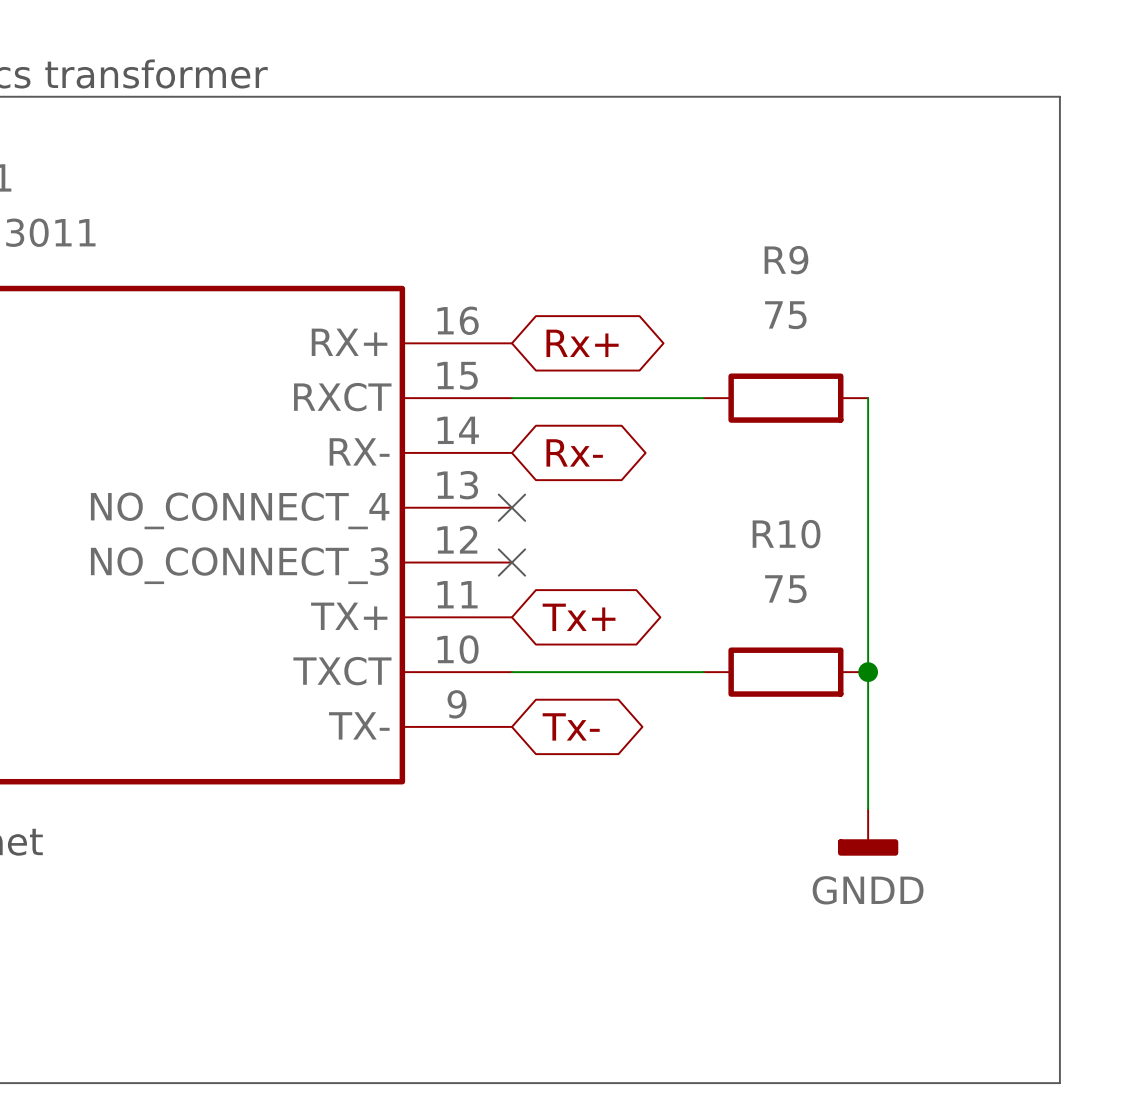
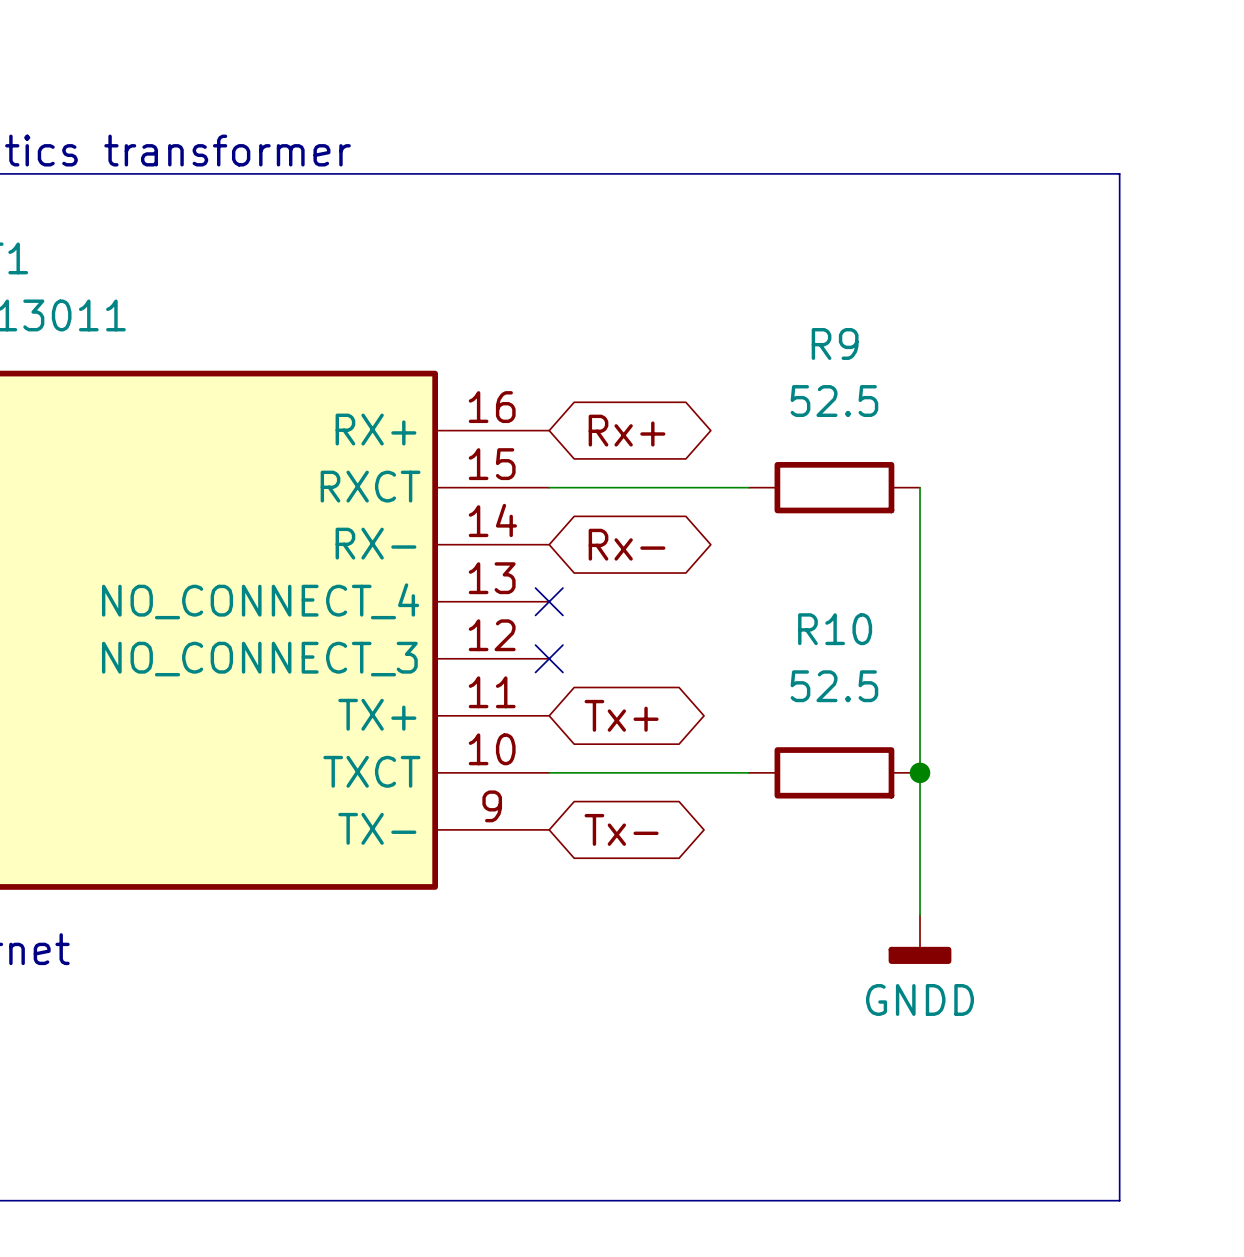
R9 value: 75 (785, 315) -> 52.5 (834, 401)
R10 value: 75 (785, 589) -> 52.5 (834, 686)

